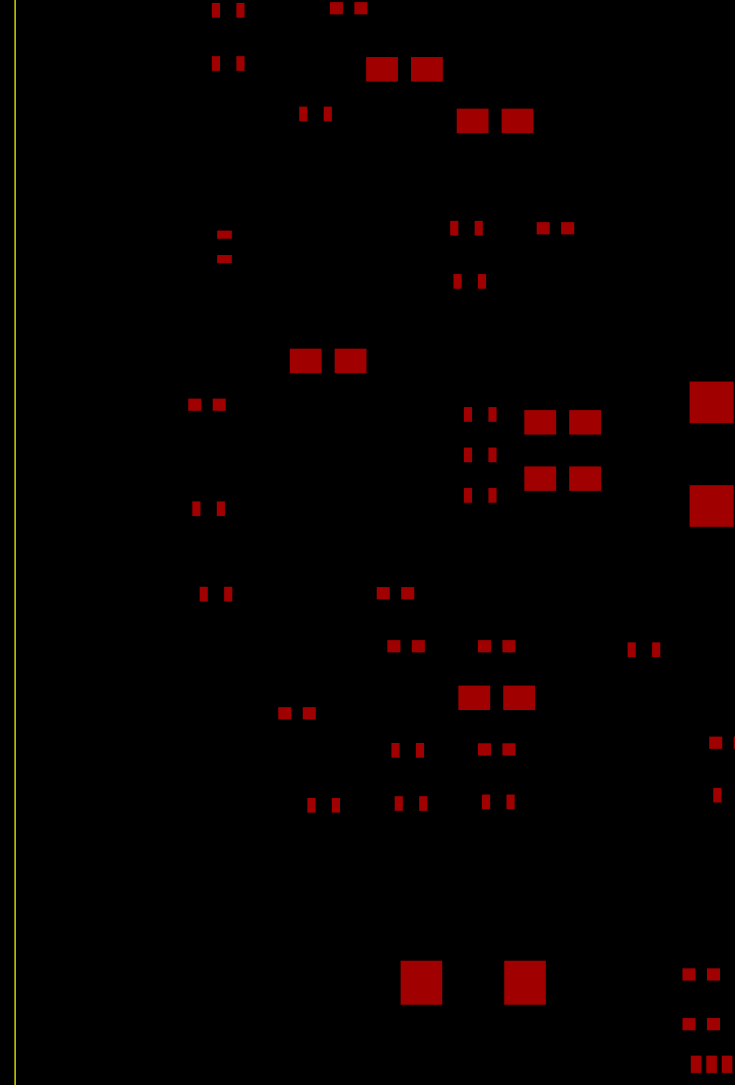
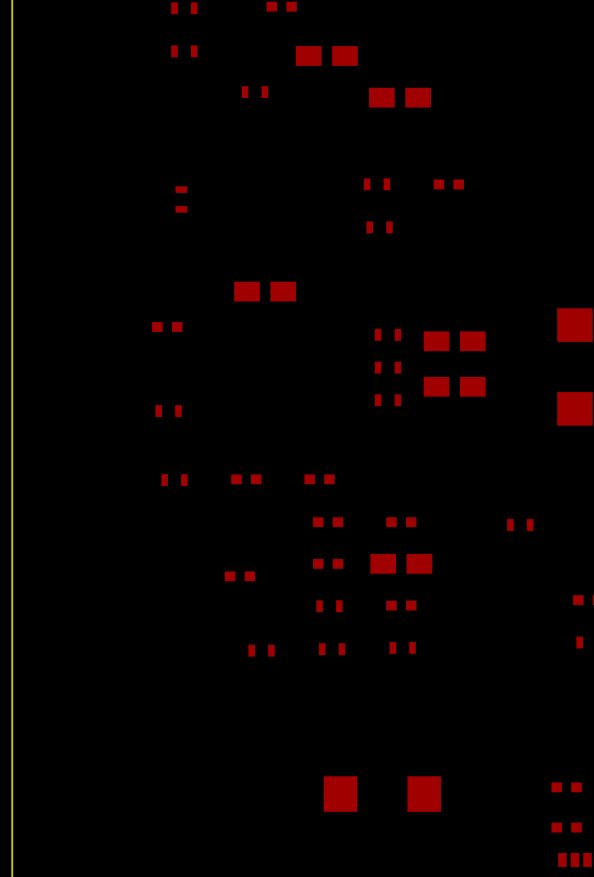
part: none -> (246, 479)
part: none -> (328, 563)

